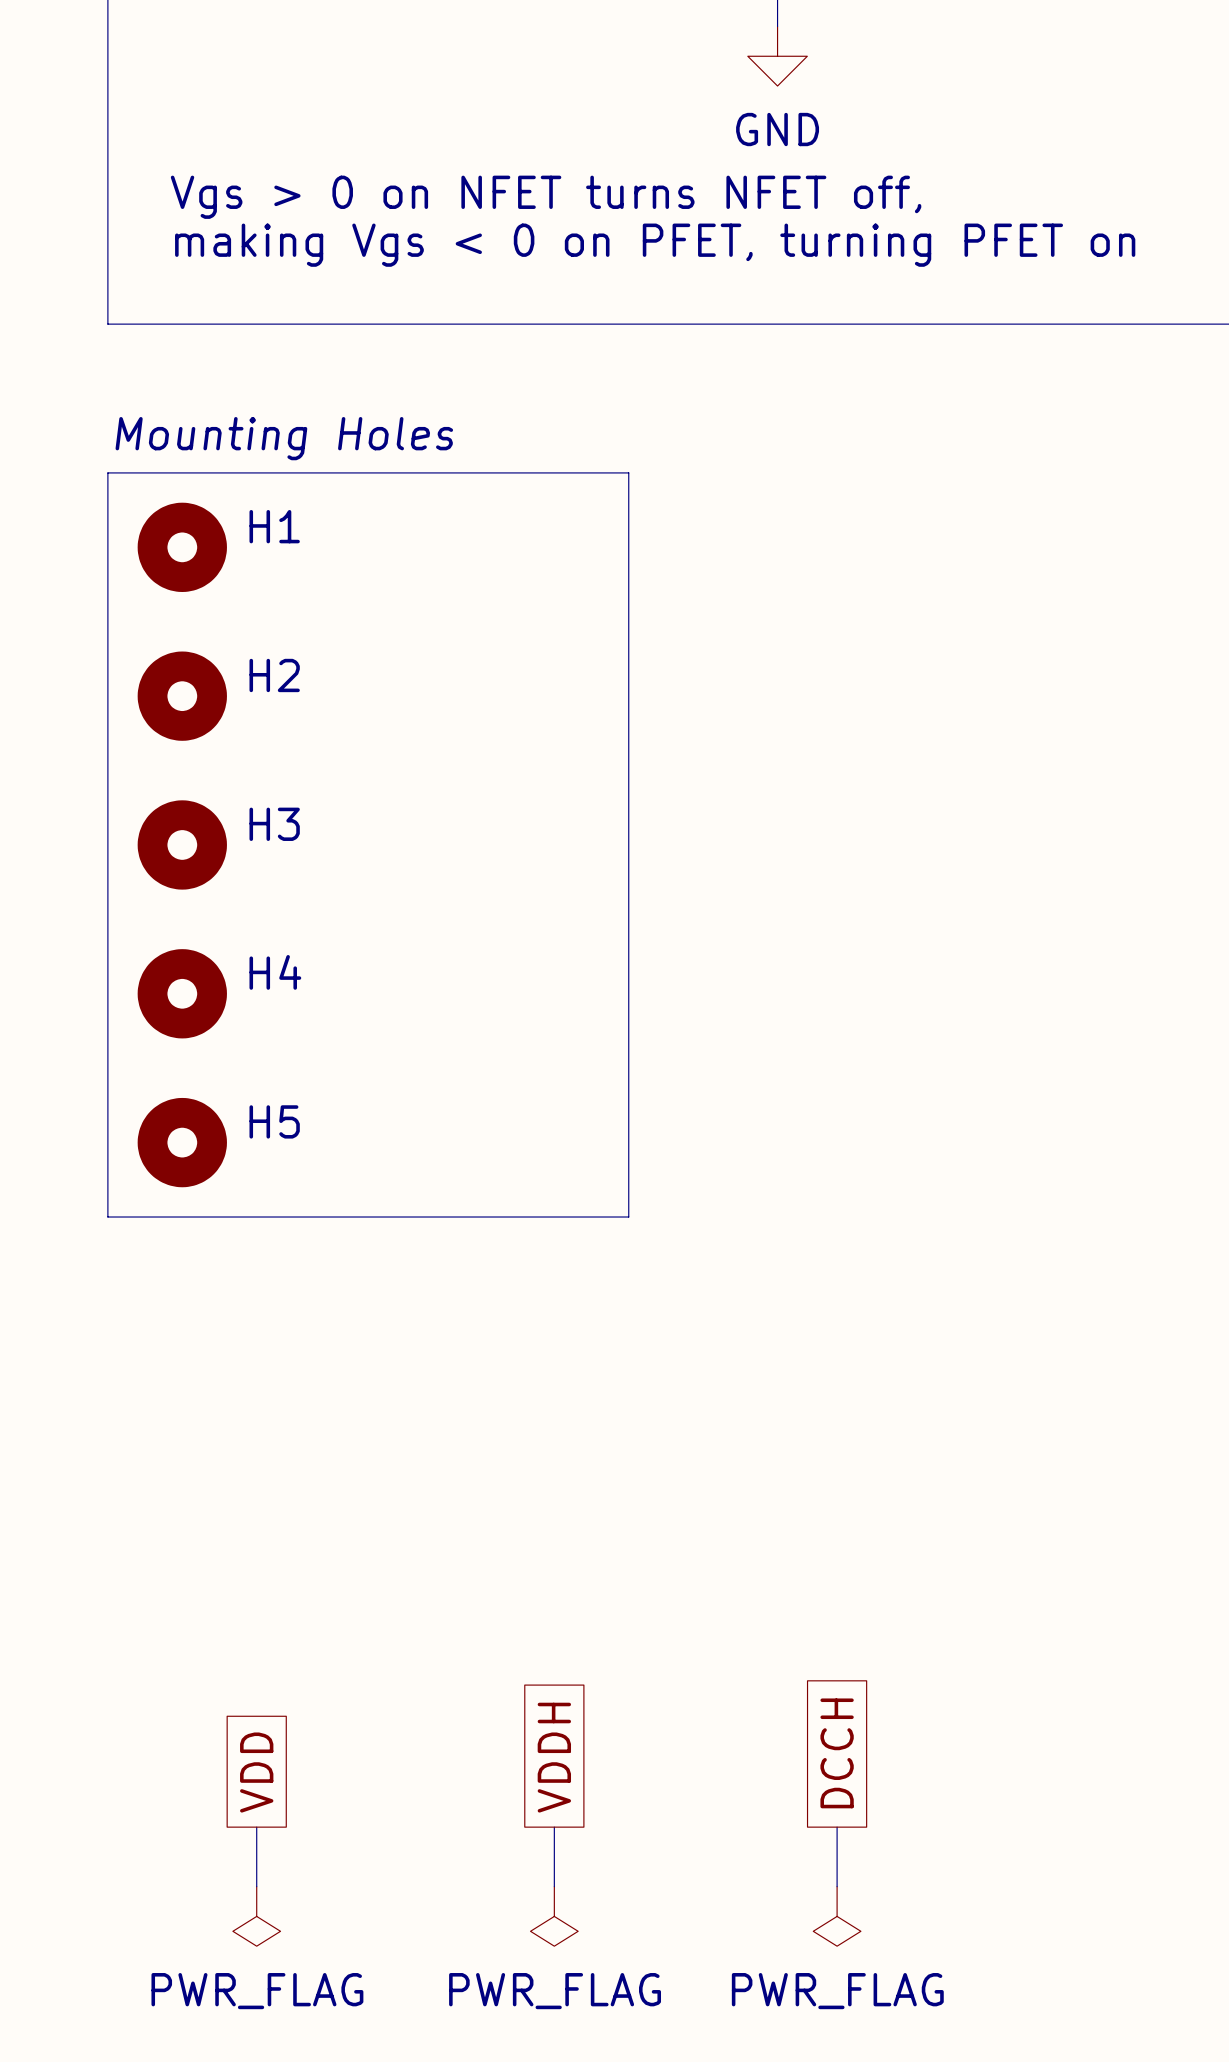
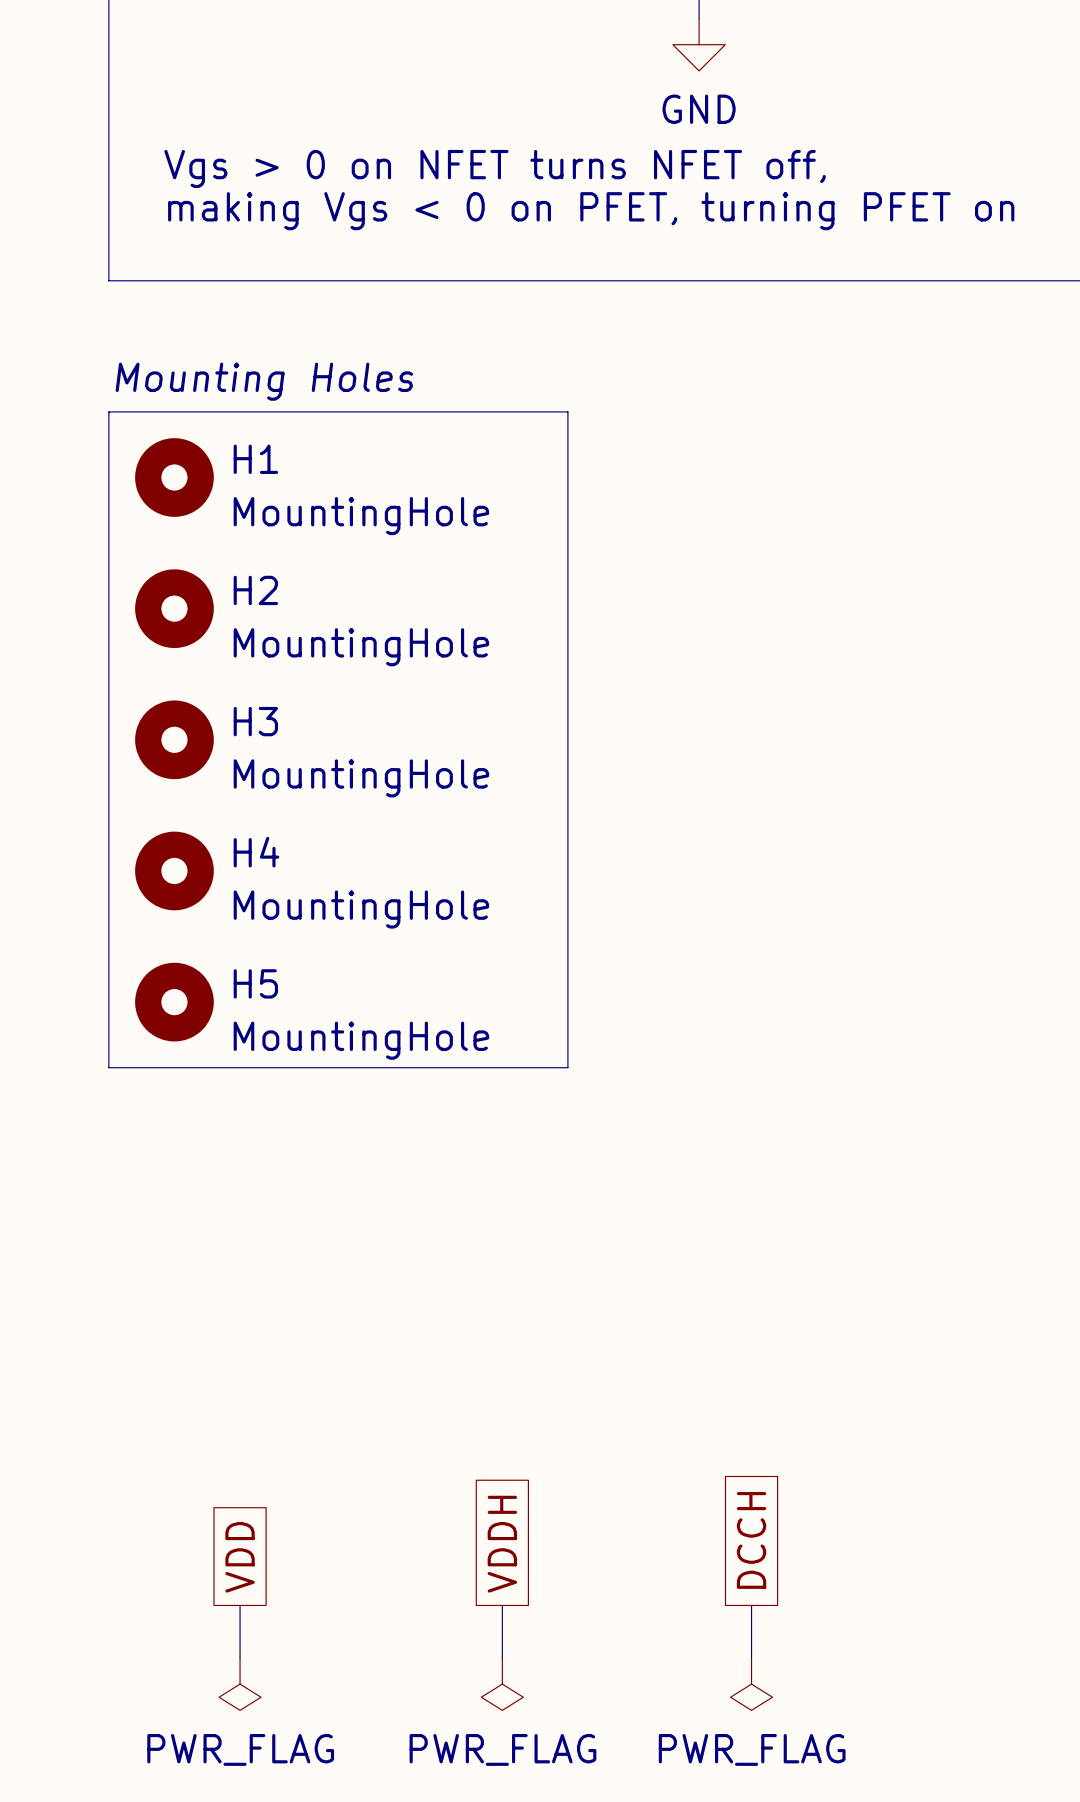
H1 value: none -> MountingHole (361, 516)
H2 value: none -> MountingHole (361, 647)
H3 value: none -> MountingHole (361, 778)
H4 value: none -> MountingHole (361, 909)
H5 value: none -> MountingHole (361, 1040)

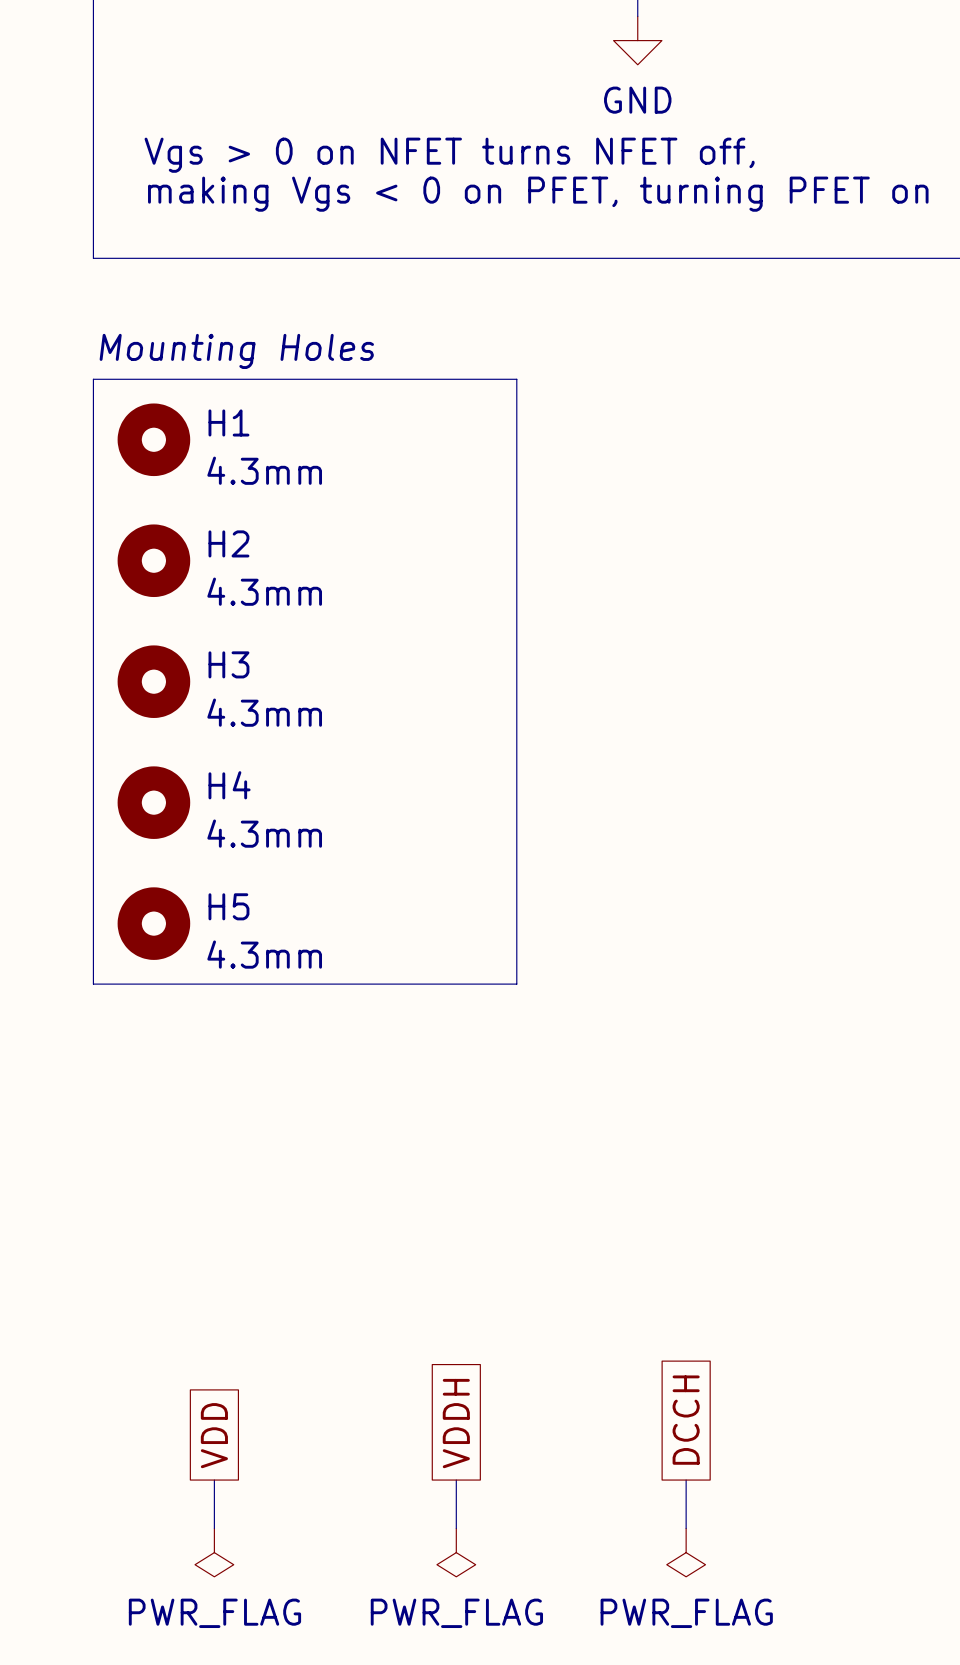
H1 value: MountingHole (361, 516) -> 4.3mm (264, 470)
H2 value: MountingHole (361, 647) -> 4.3mm (264, 591)
H3 value: MountingHole (361, 778) -> 4.3mm (264, 712)
H4 value: MountingHole (361, 909) -> 4.3mm (264, 833)
H5 value: MountingHole (361, 1040) -> 4.3mm (264, 954)

